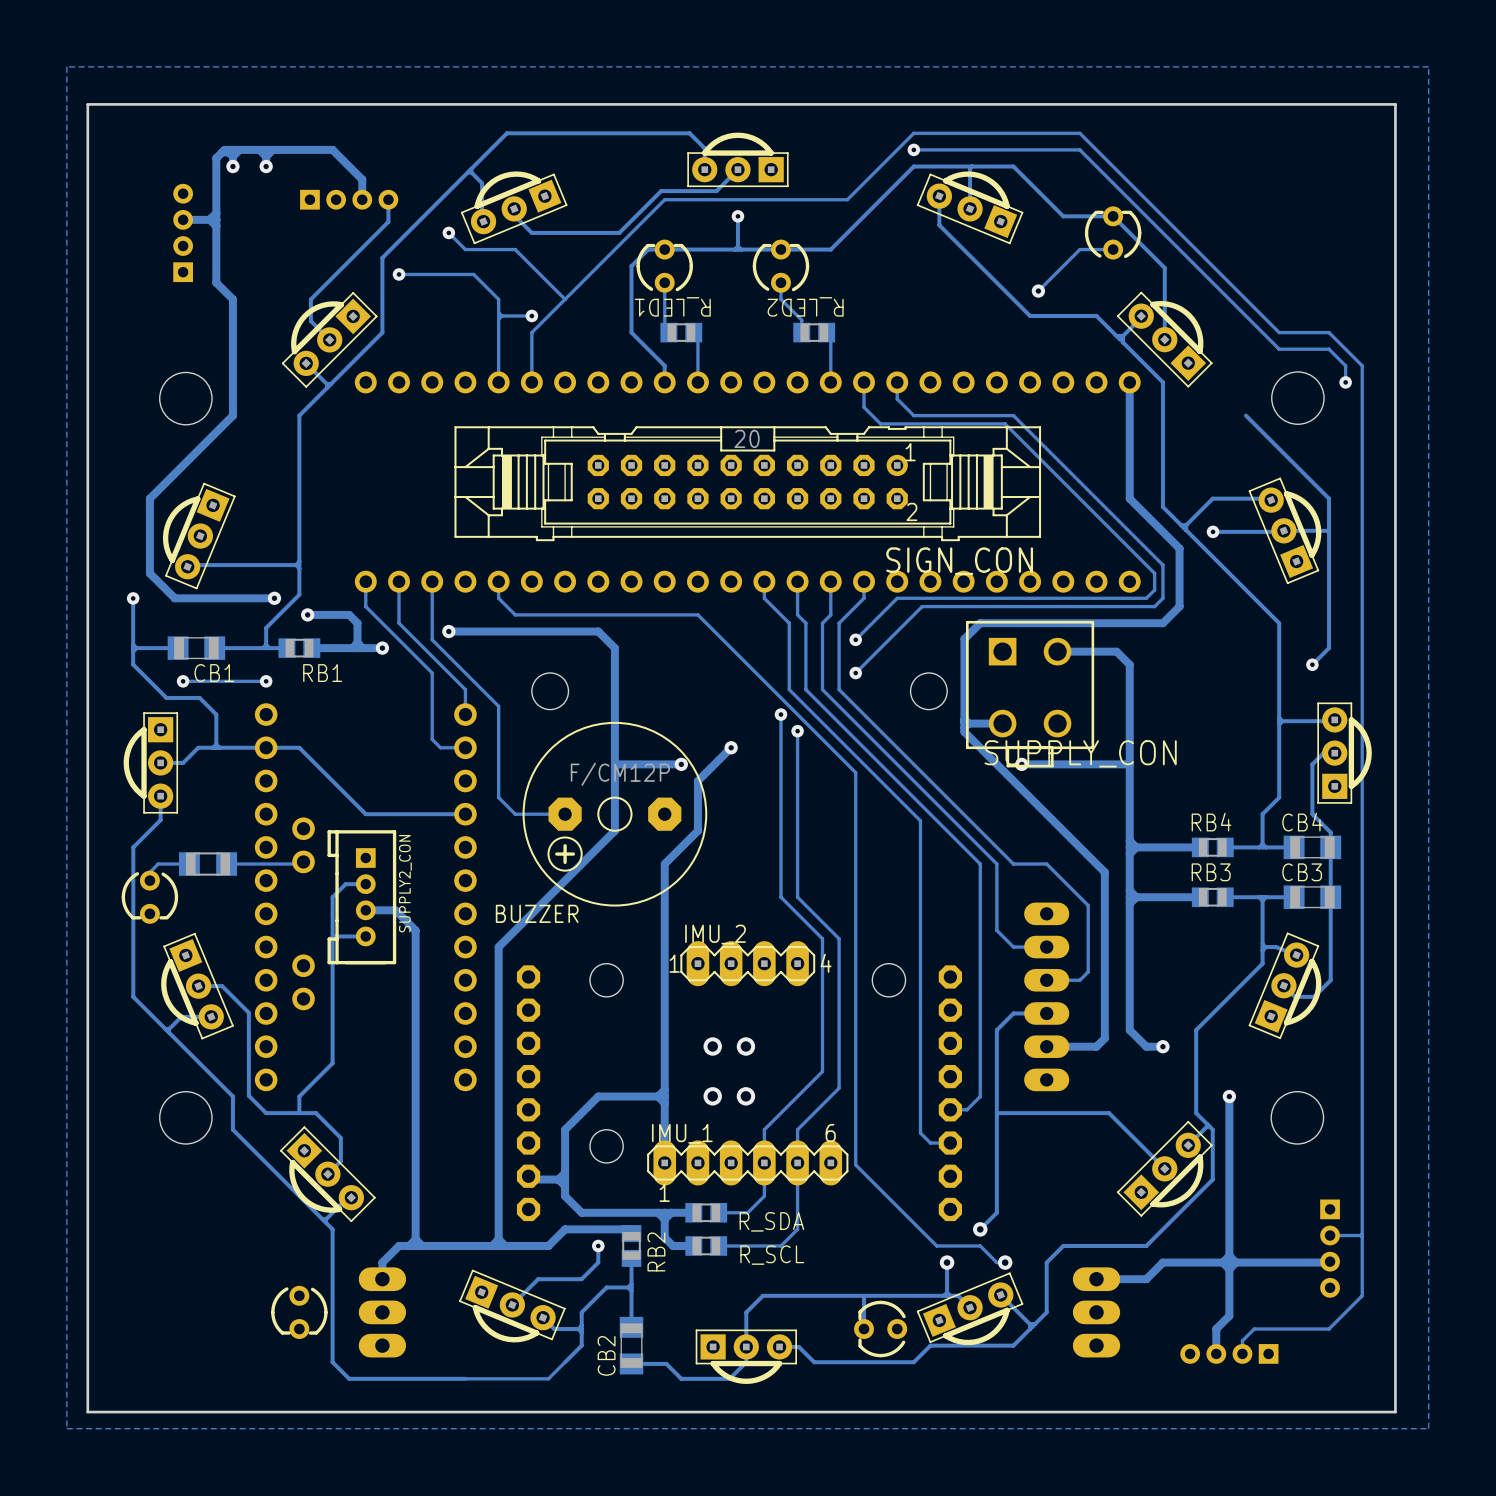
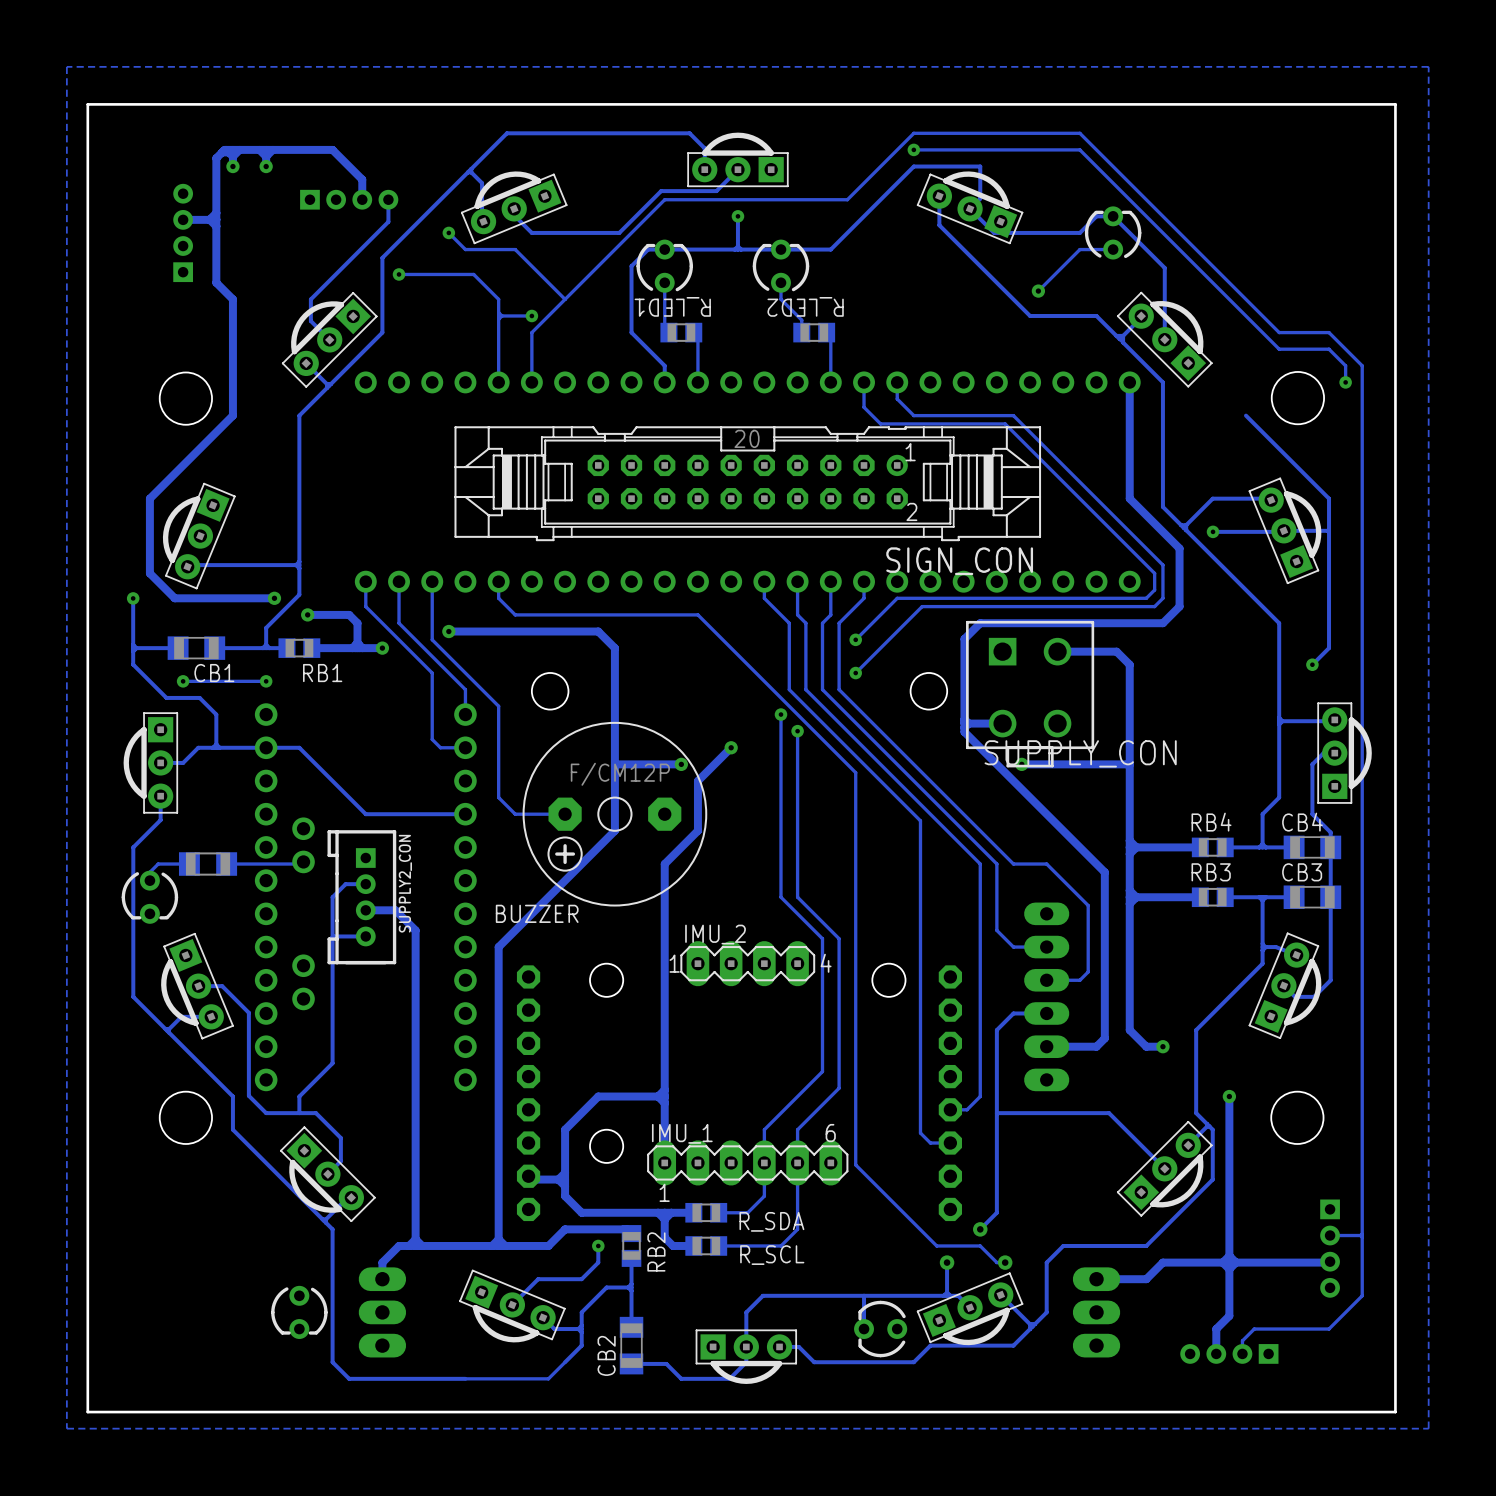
track: (971, 166) (970, 168) (970, 208) -> none
track: (980, 166) (1013, 166) (1063, 216) (1096, 216) -> (980, 166) (980, 198) (970, 208) (994, 232) (1079, 232) (1096, 216)
via: (712, 1046) -> none
via: (745, 1046) -> none
via: (712, 1096) -> none
via: (745, 1096) -> none

